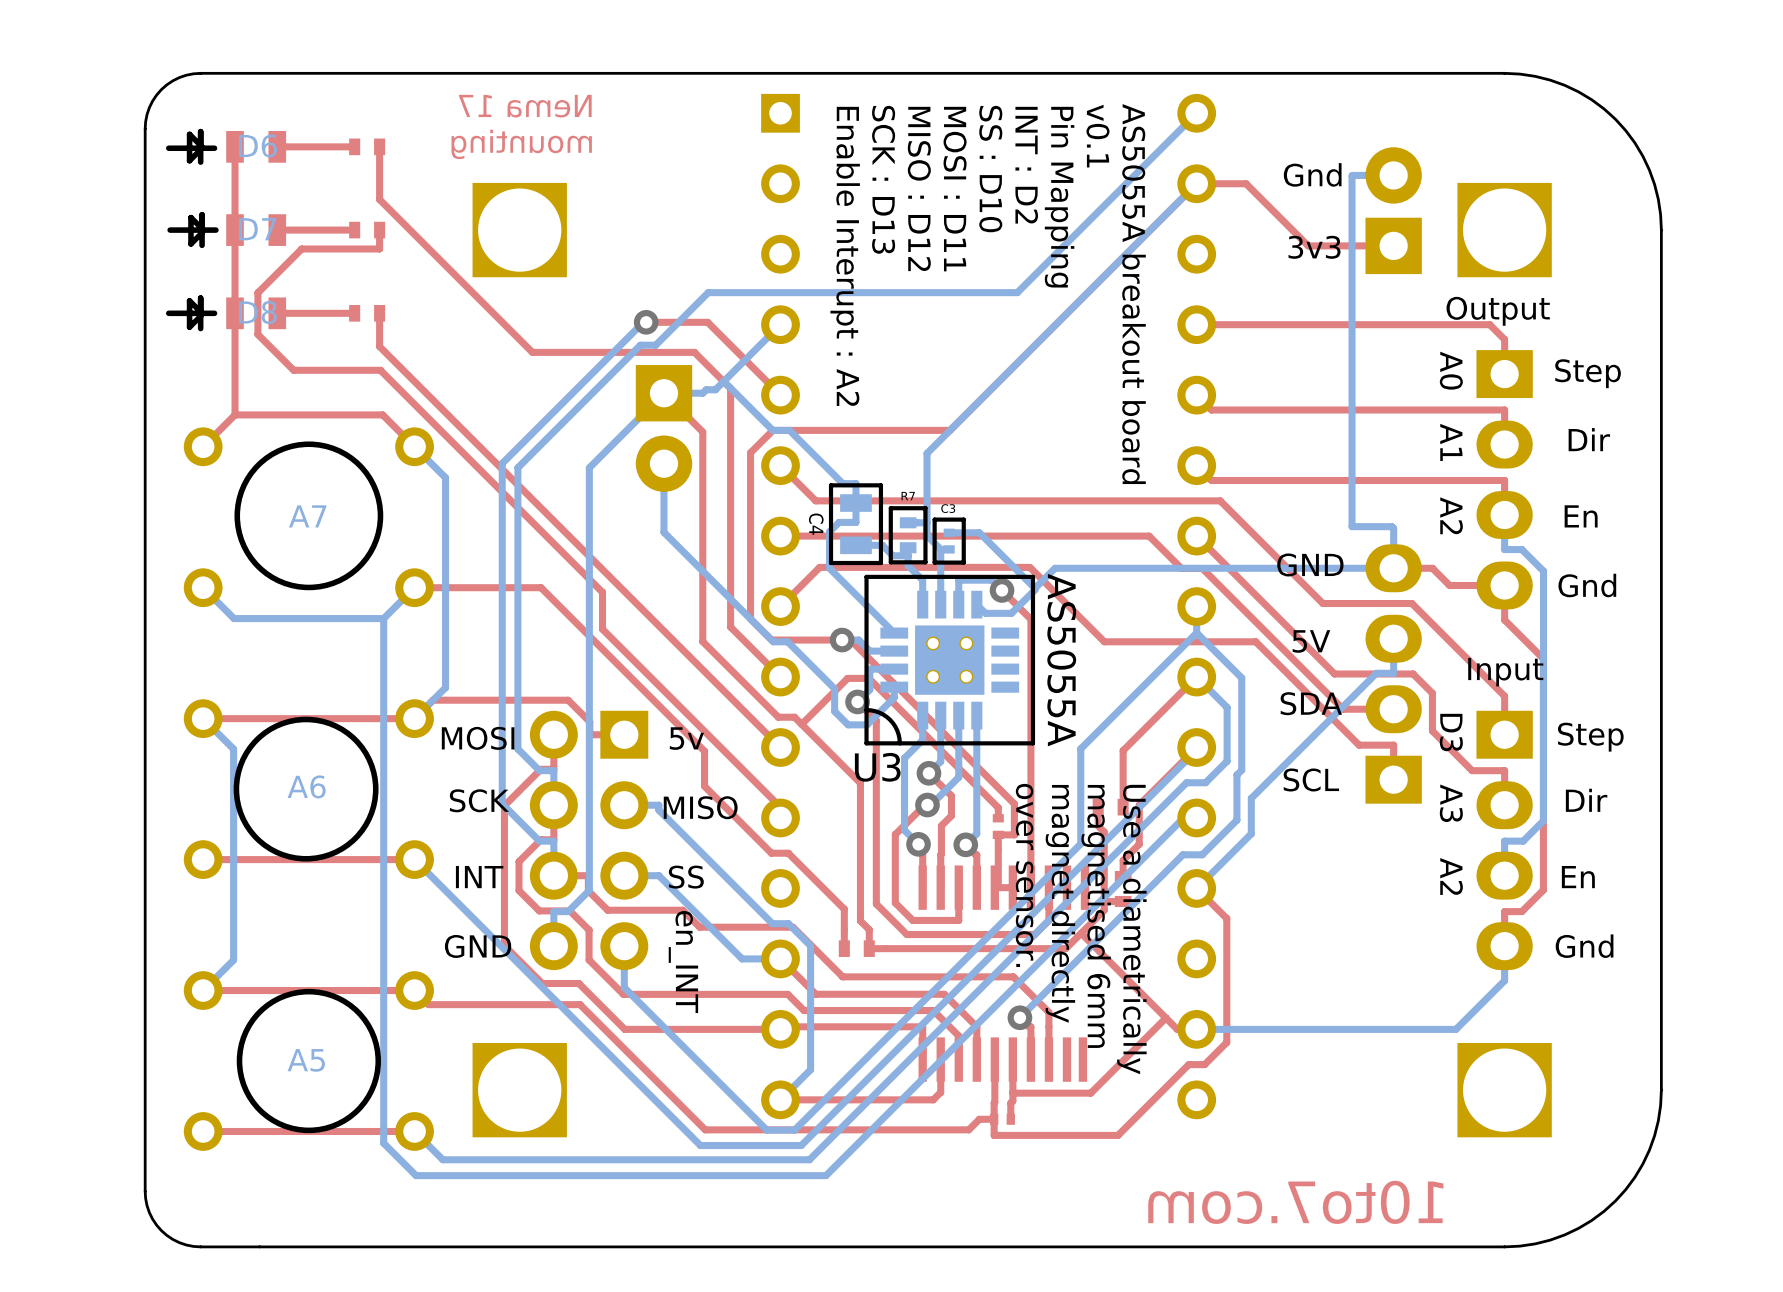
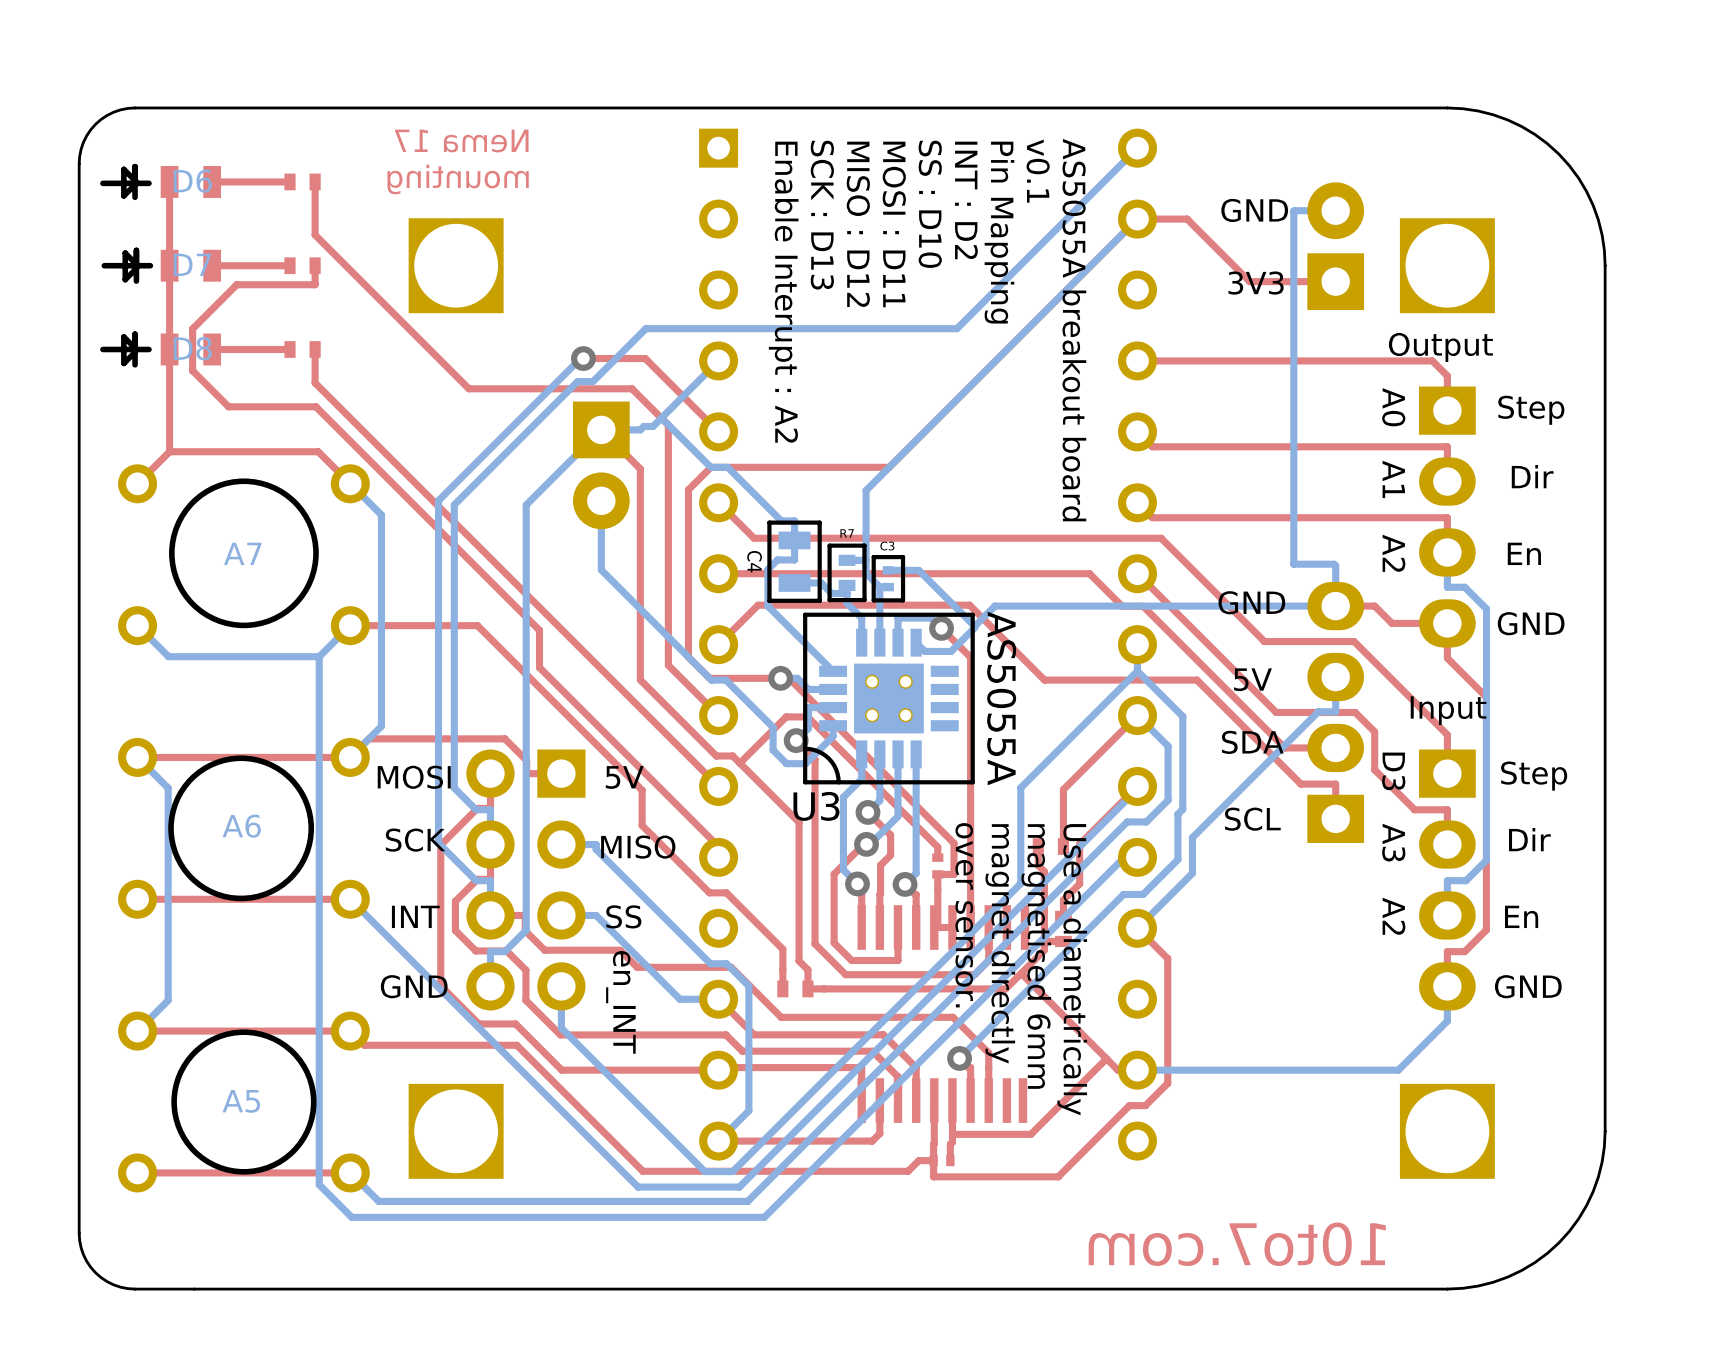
text: Gnd (1312, 174) -> GND (1254, 210)
text: 3v3 (1314, 247) -> 3V3 (1256, 283)
text: Gnd (1587, 585) -> GND (1531, 623)
text: 5v (686, 738) -> 5V (624, 777)
text: Gnd (1584, 946) -> GND (1528, 986)

